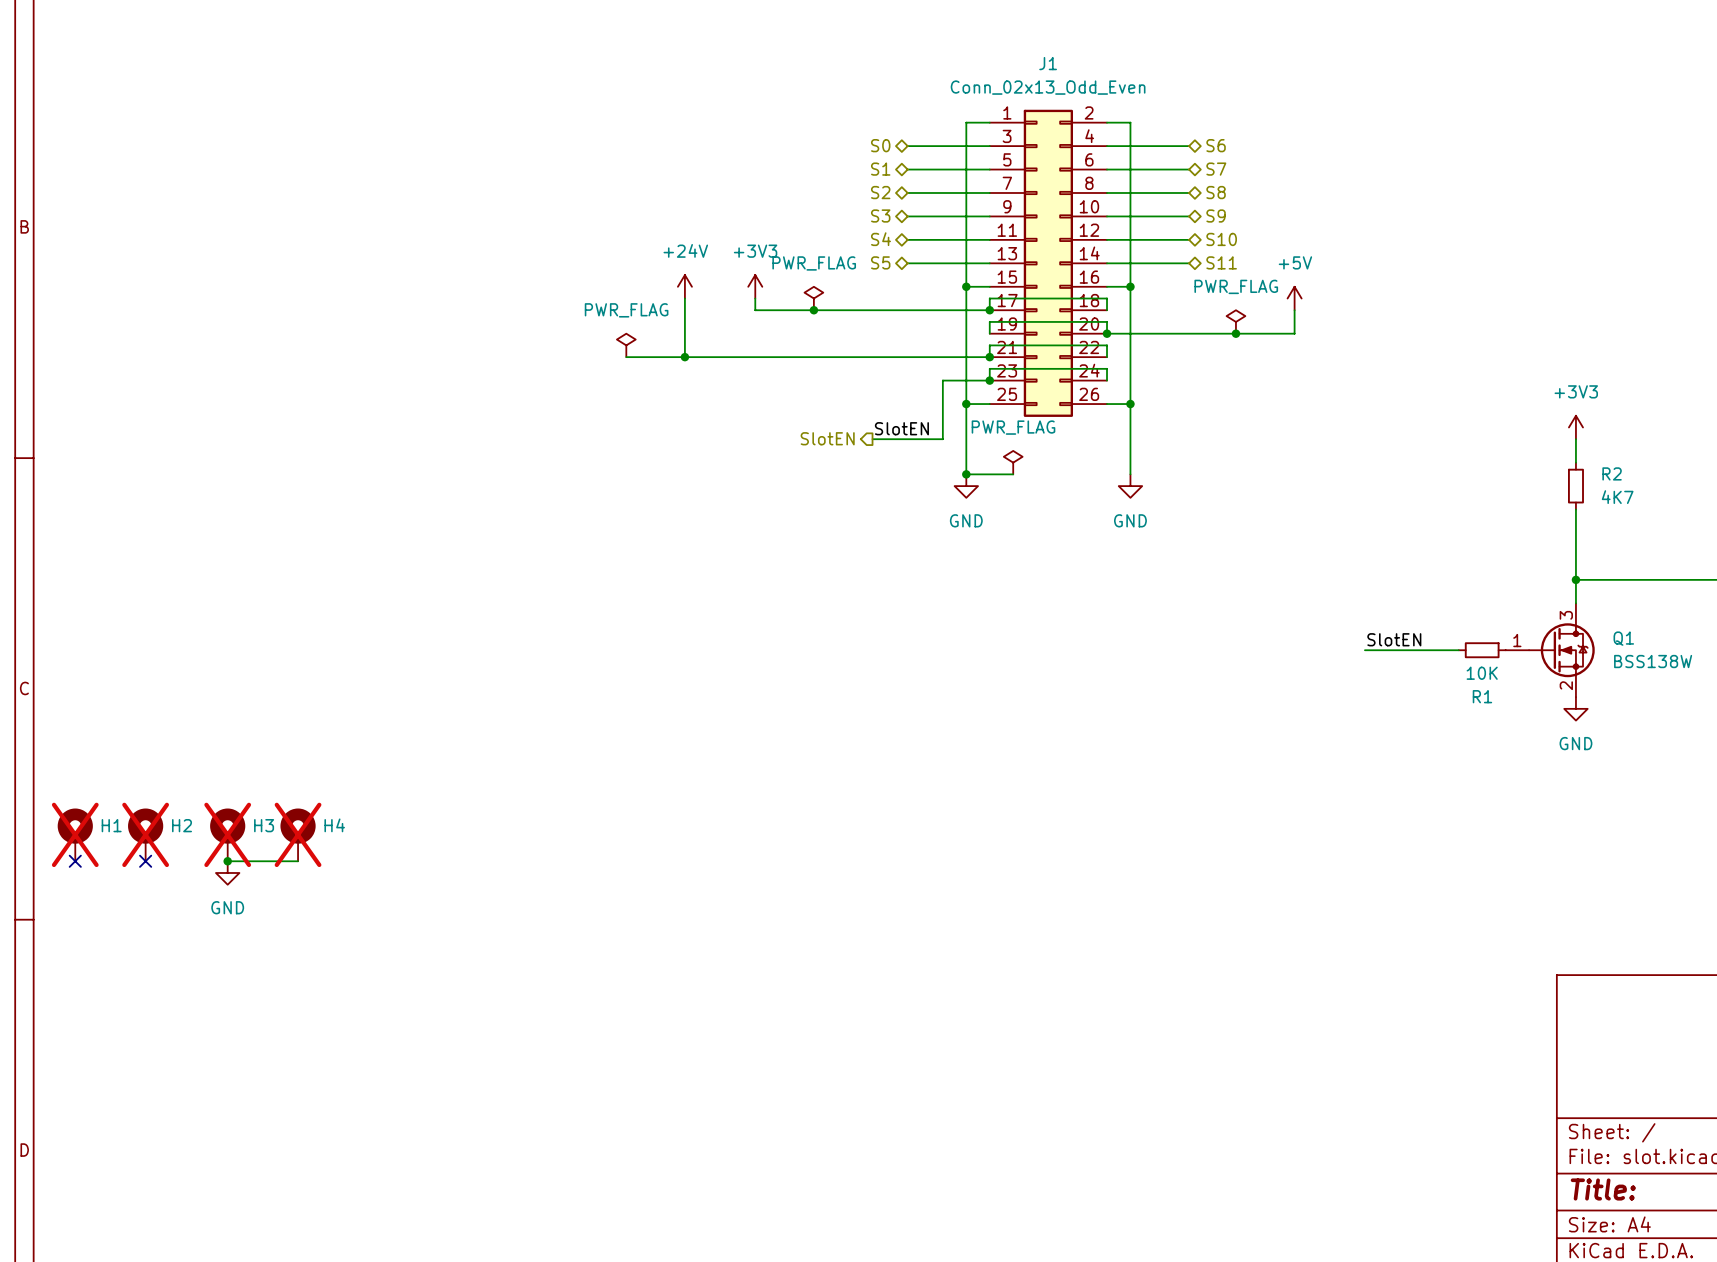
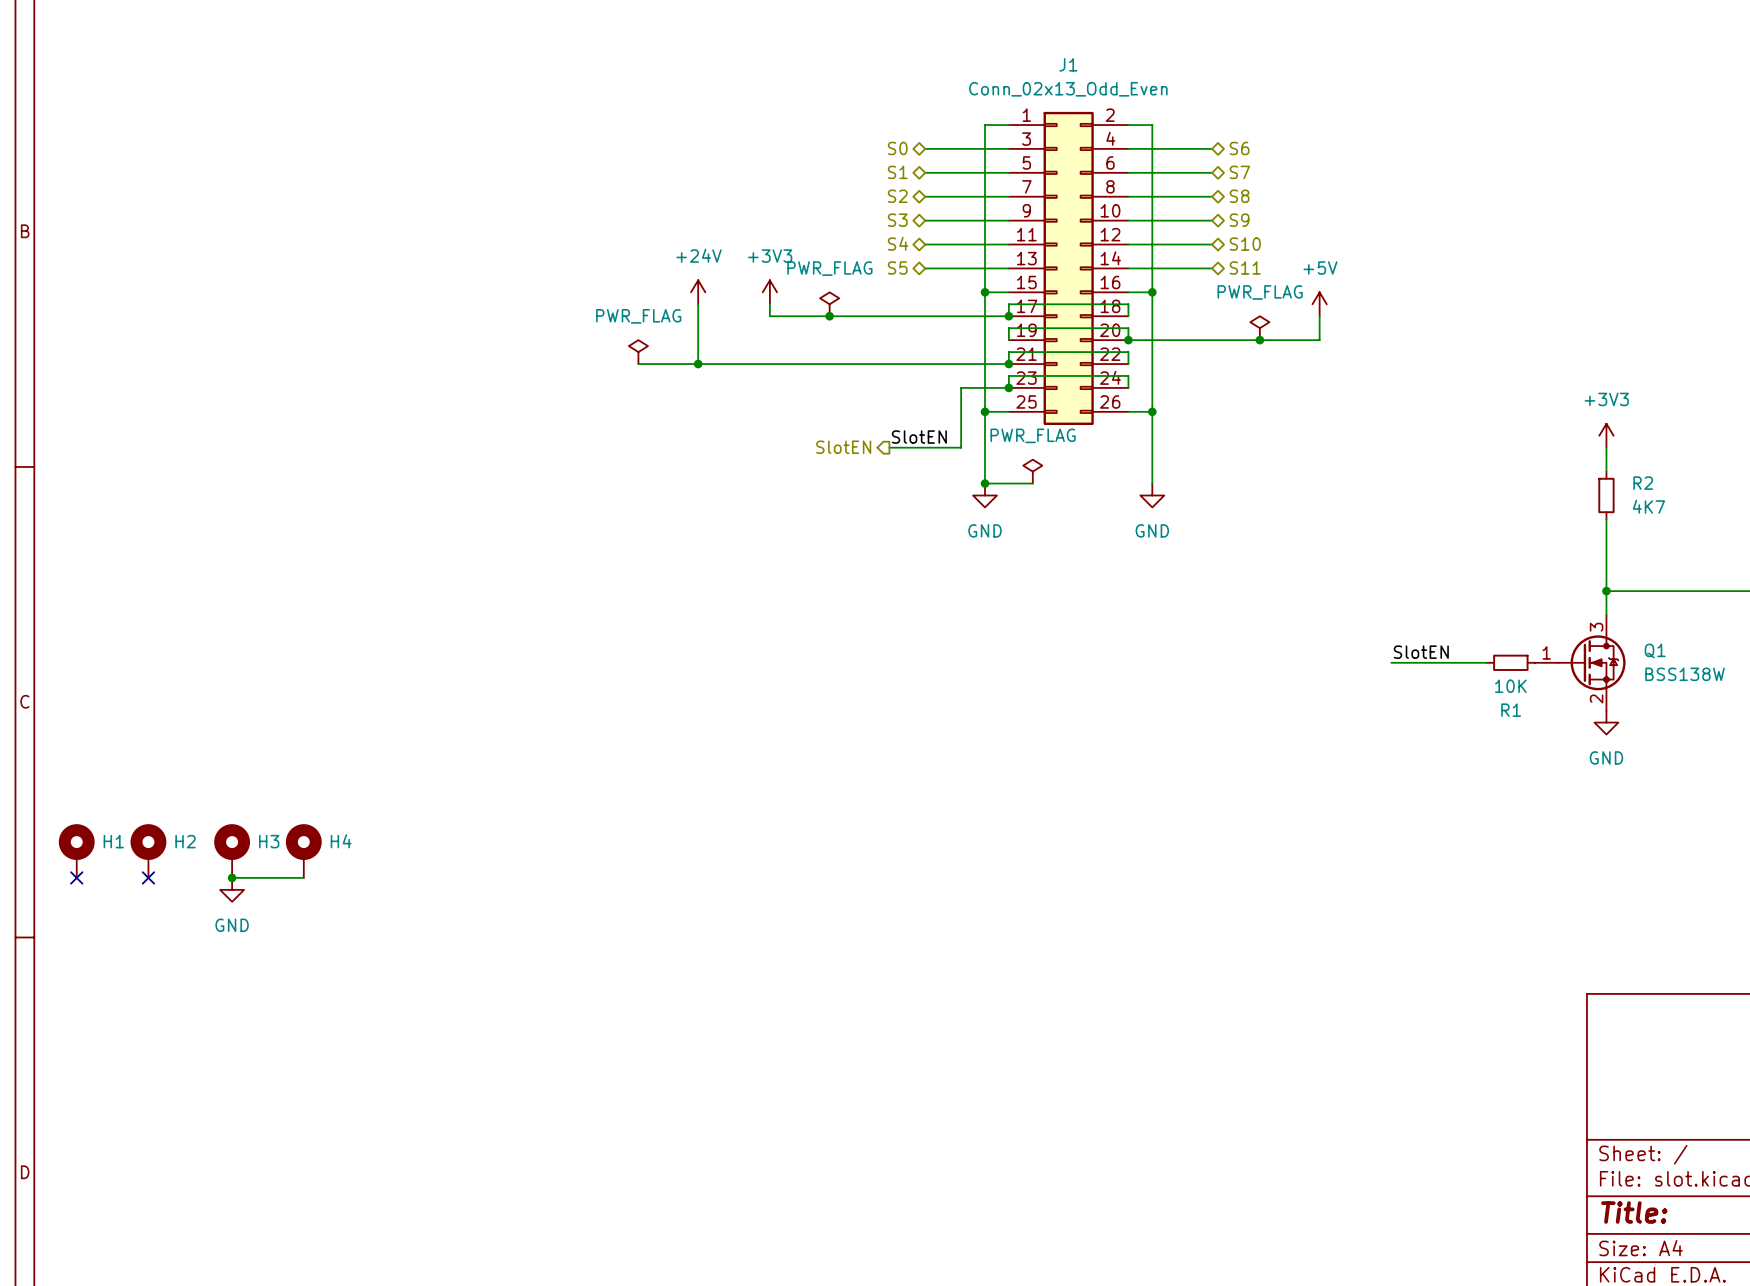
H1 do-not-place cross: (75, 834) -> none
H2 do-not-place cross: (145, 834) -> none
H3 do-not-place cross: (227, 834) -> none
H4 do-not-place cross: (298, 834) -> none

